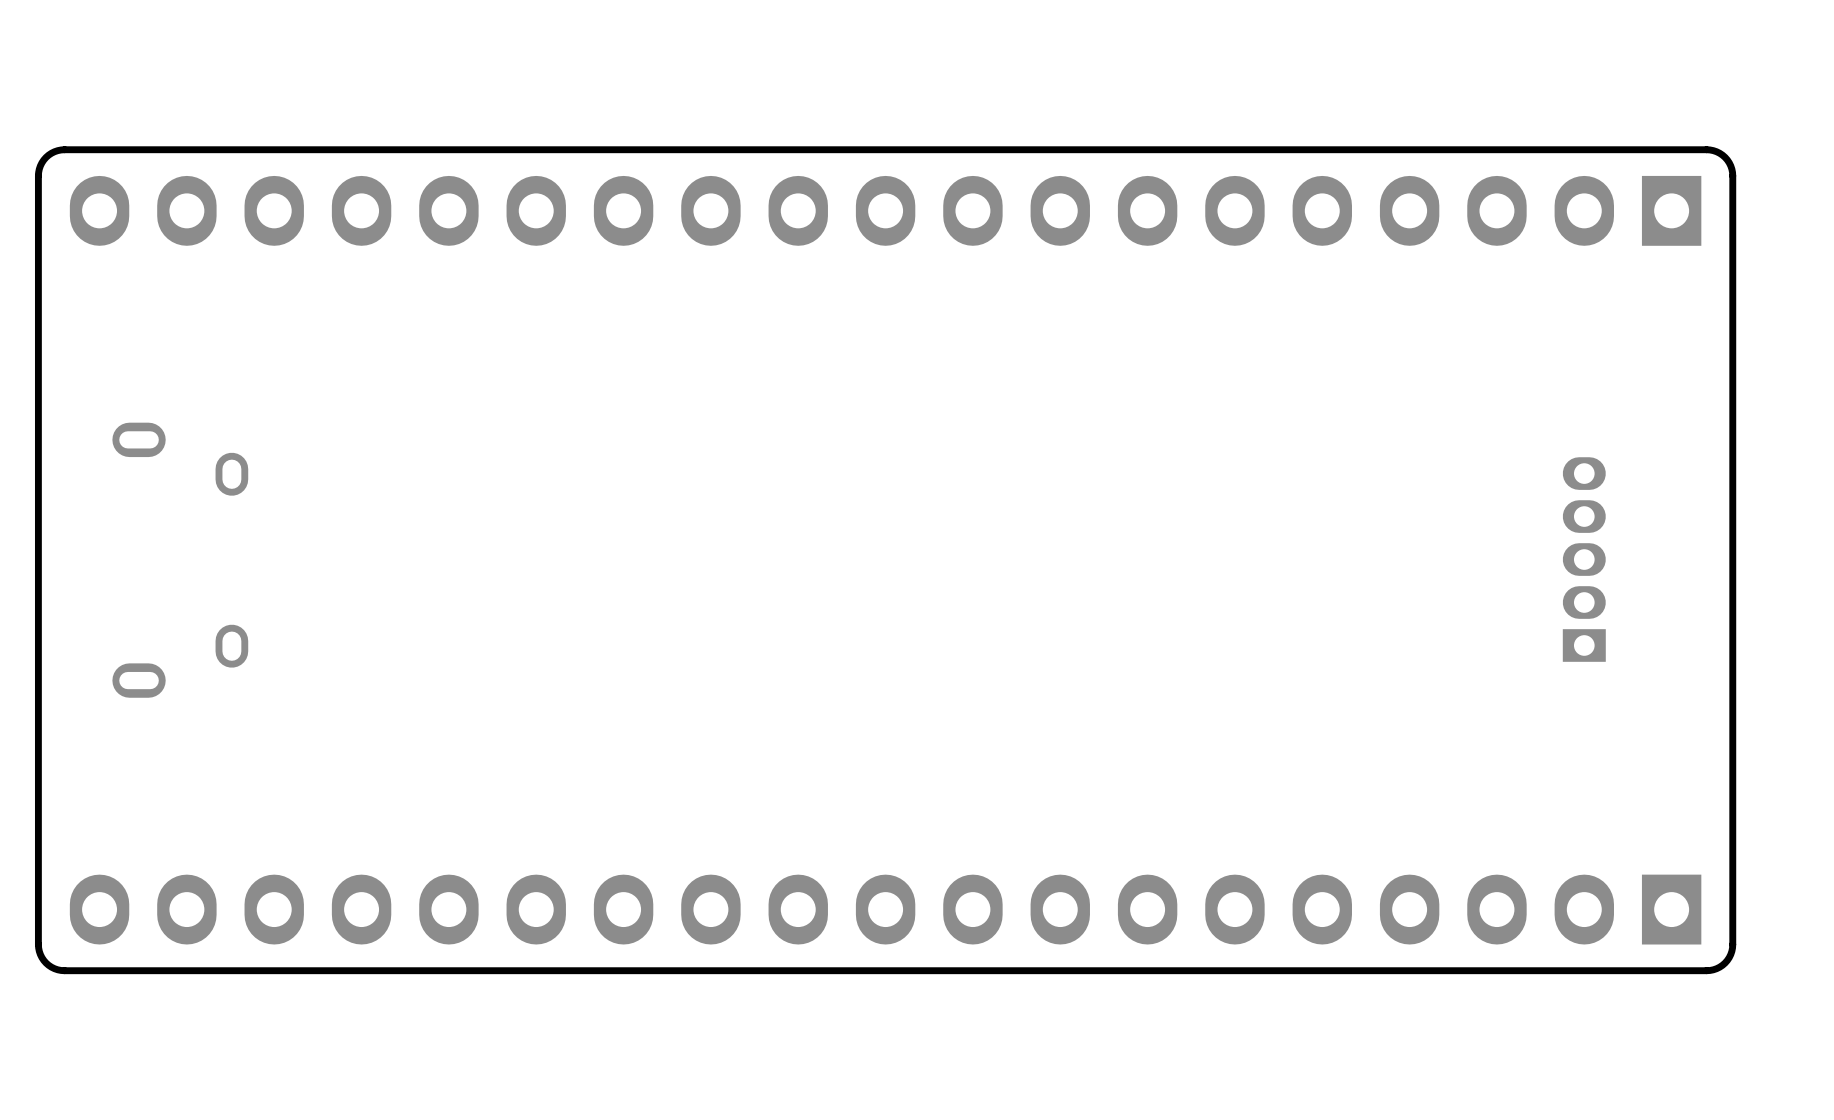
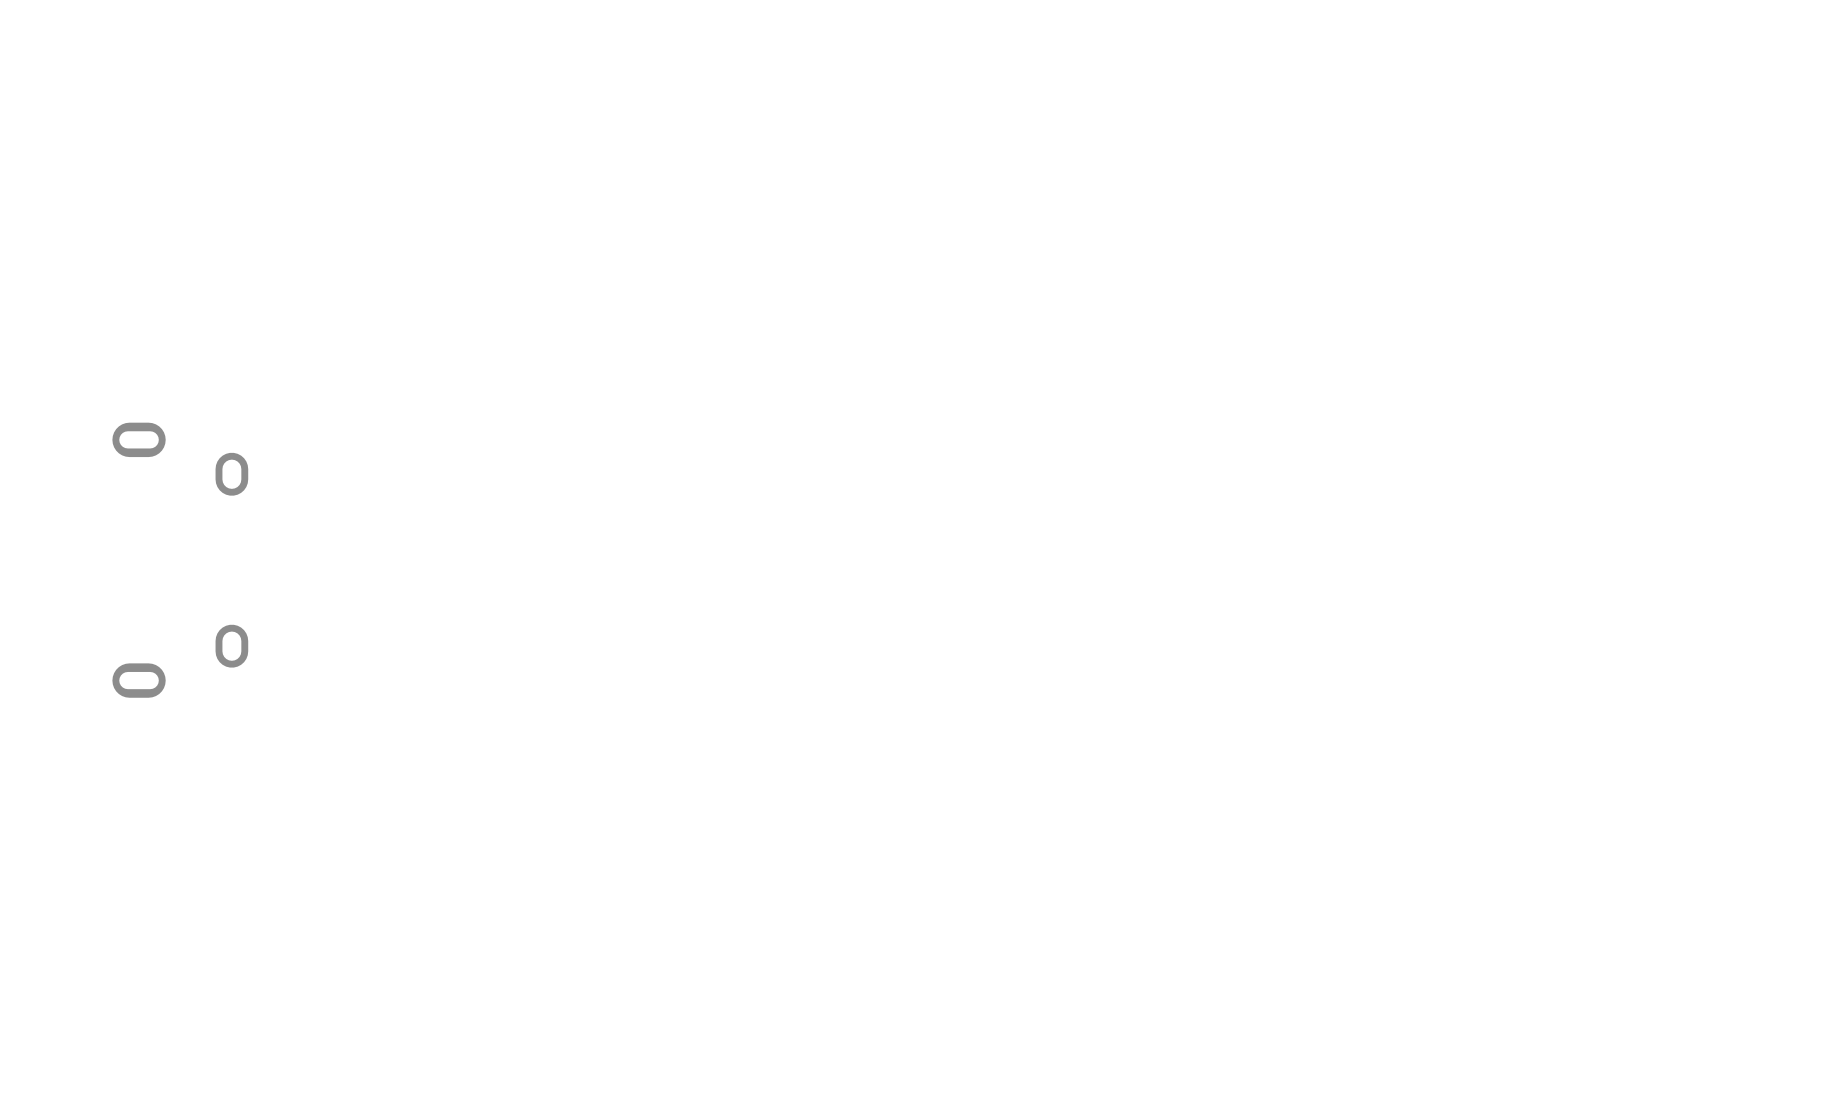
board edge: (1706, 149) (64, 149) (54, 151) (43, 159) (38, 175) (38, 944) (40, 954) (48, 965) (64, 970) (1706, 970) (1716, 968) (1727, 960) (1732, 944) (1732, 175) (1730, 165) (1725, 157) (1716, 151) (1706, 149) -> none
part: (885, 210) -> none
part: (1584, 559) -> none
part: (885, 909) -> none

